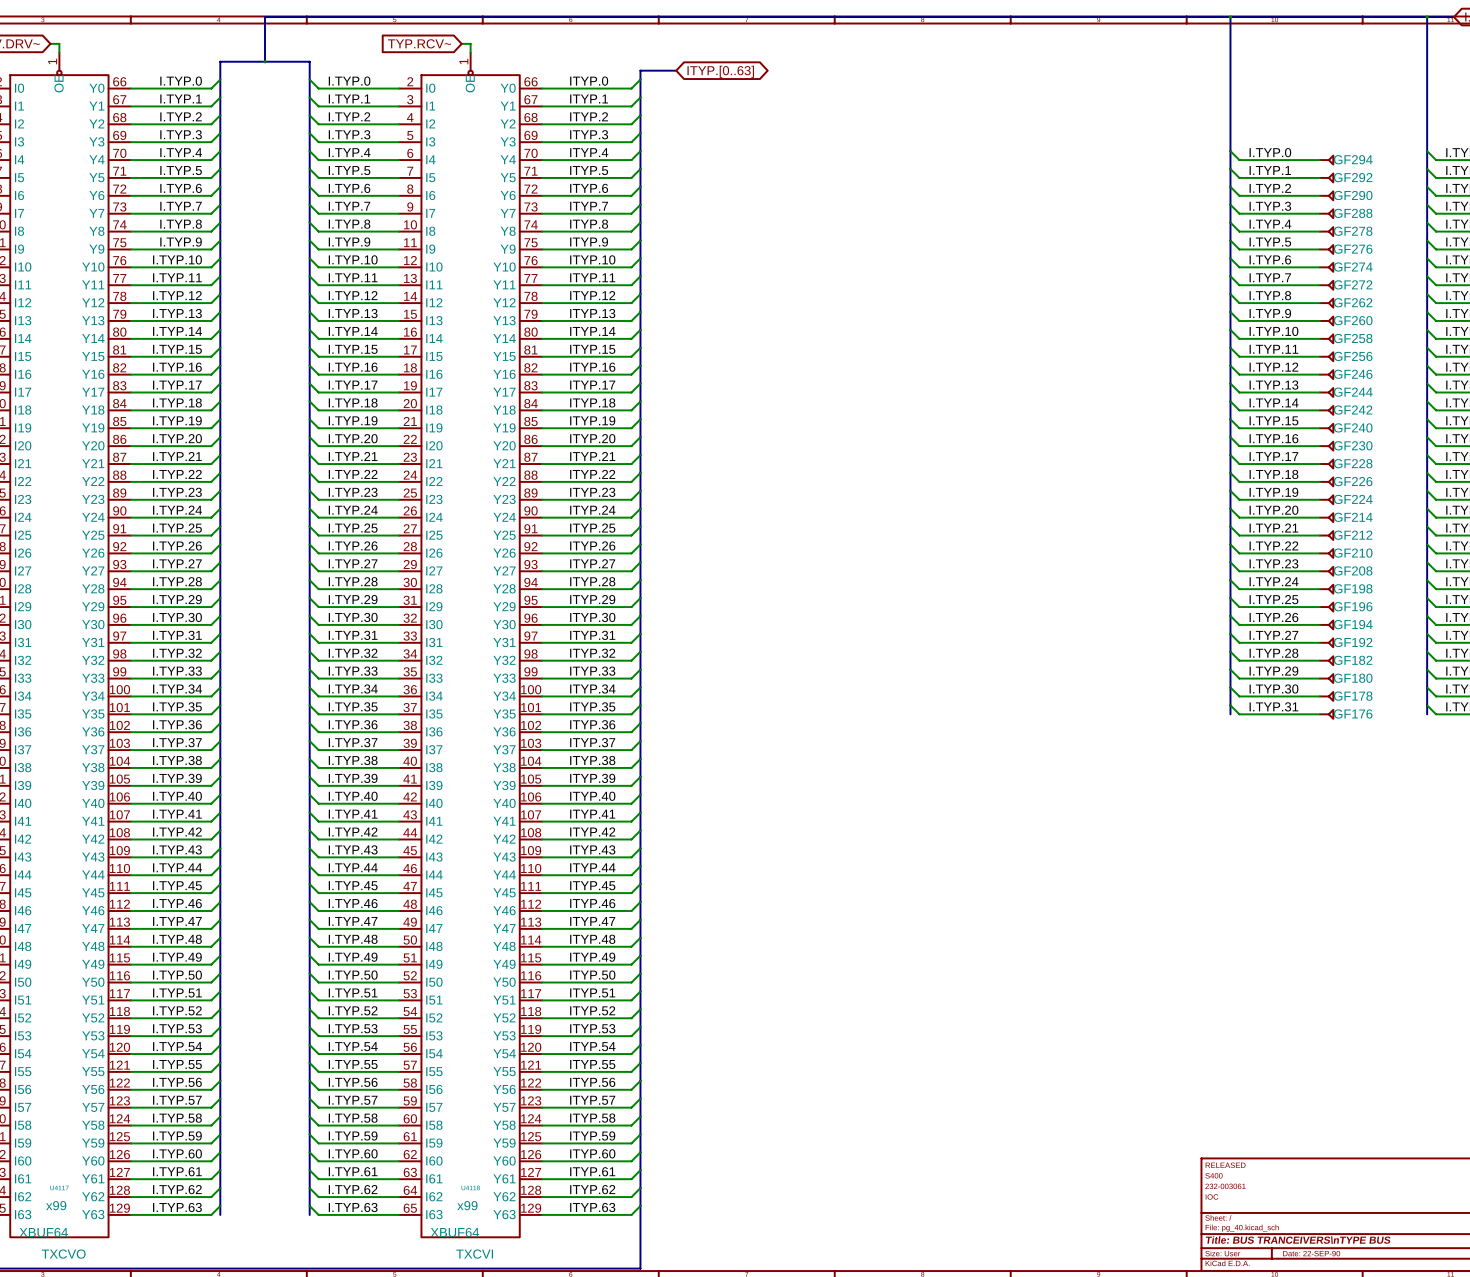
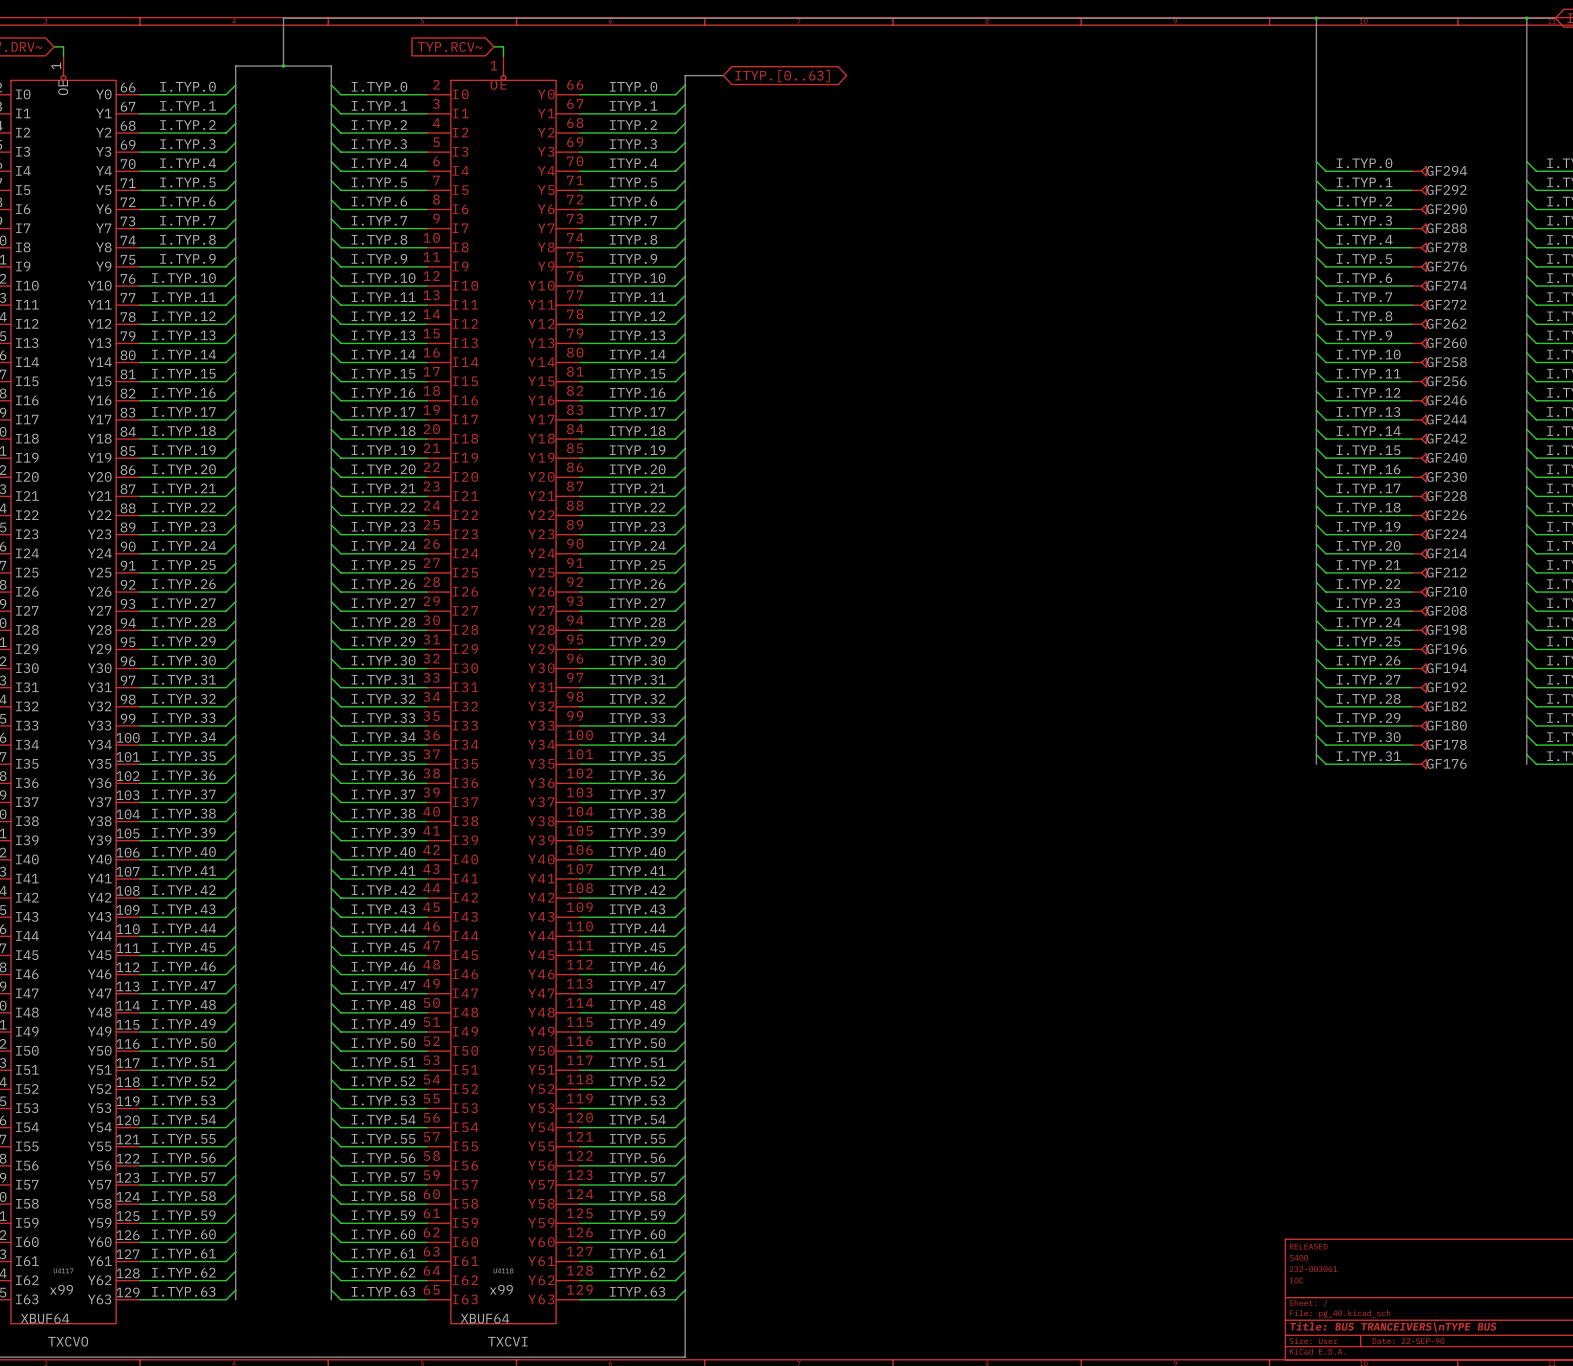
part symbol: [399, 52, 543, 1238] -> [426, 56, 580, 1324]

